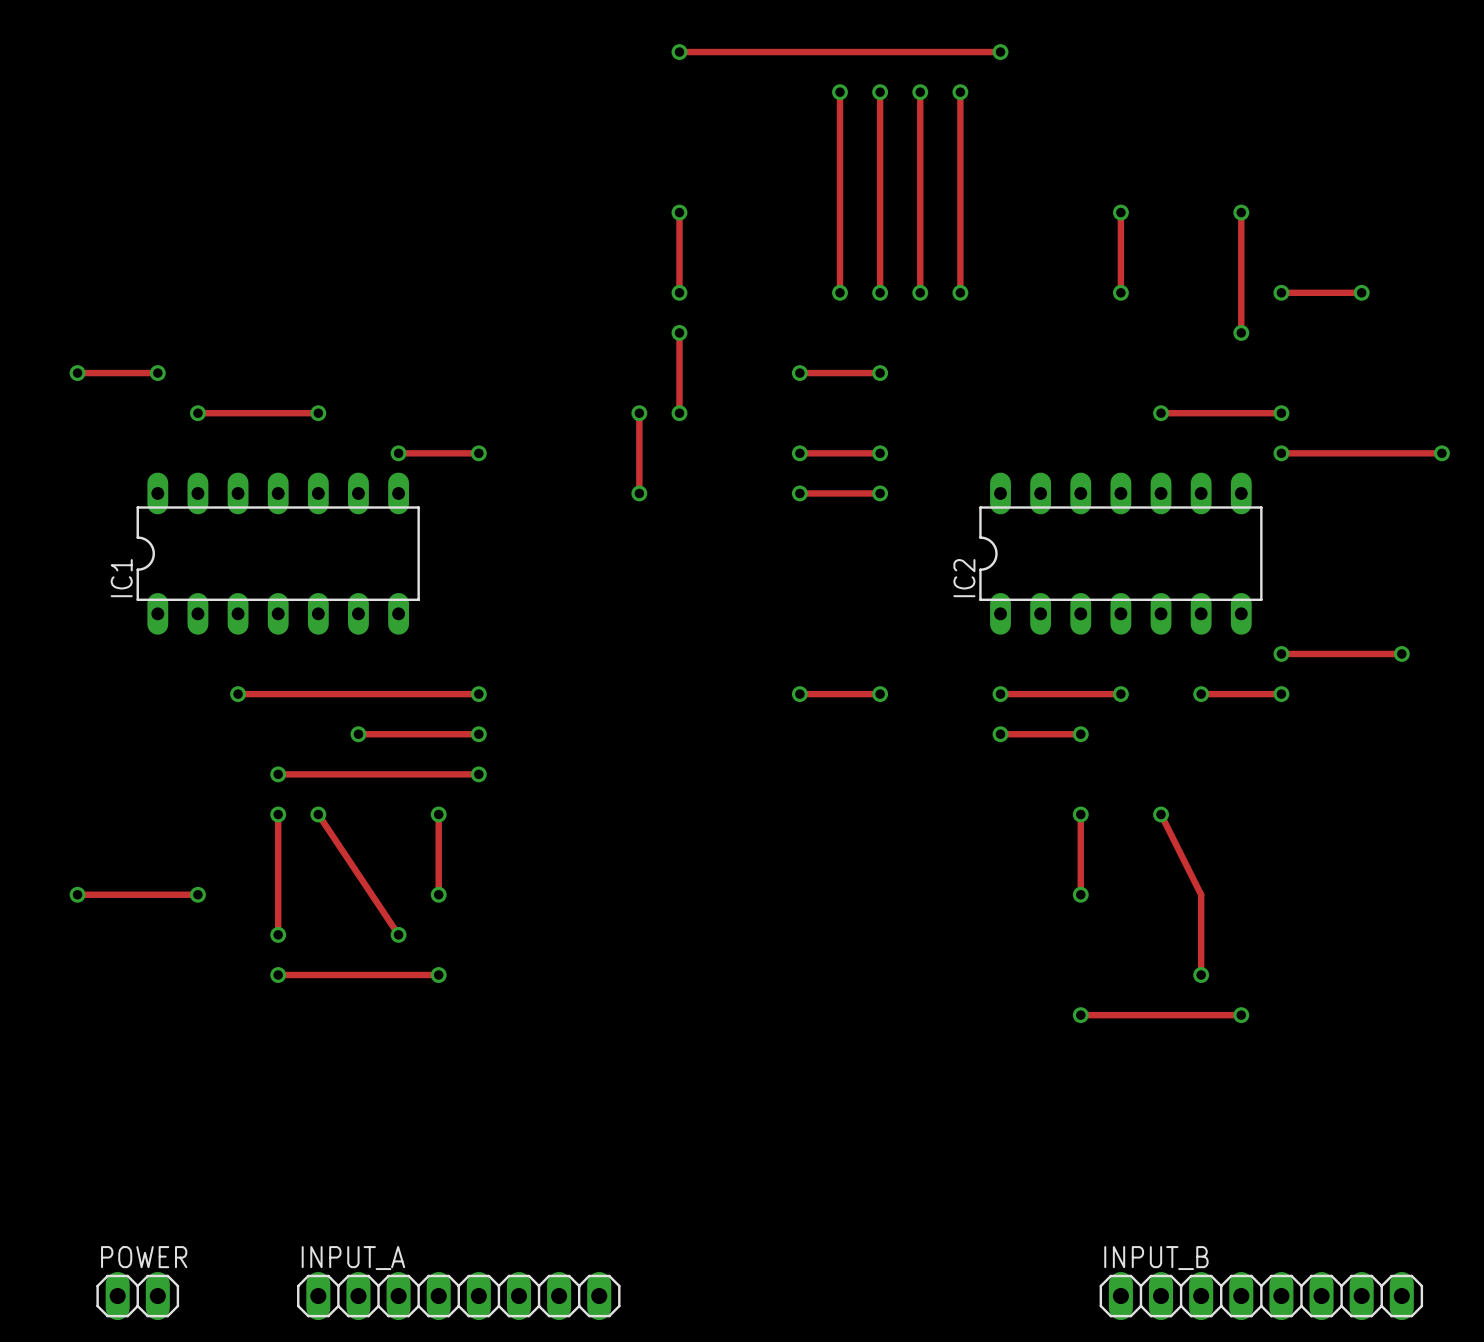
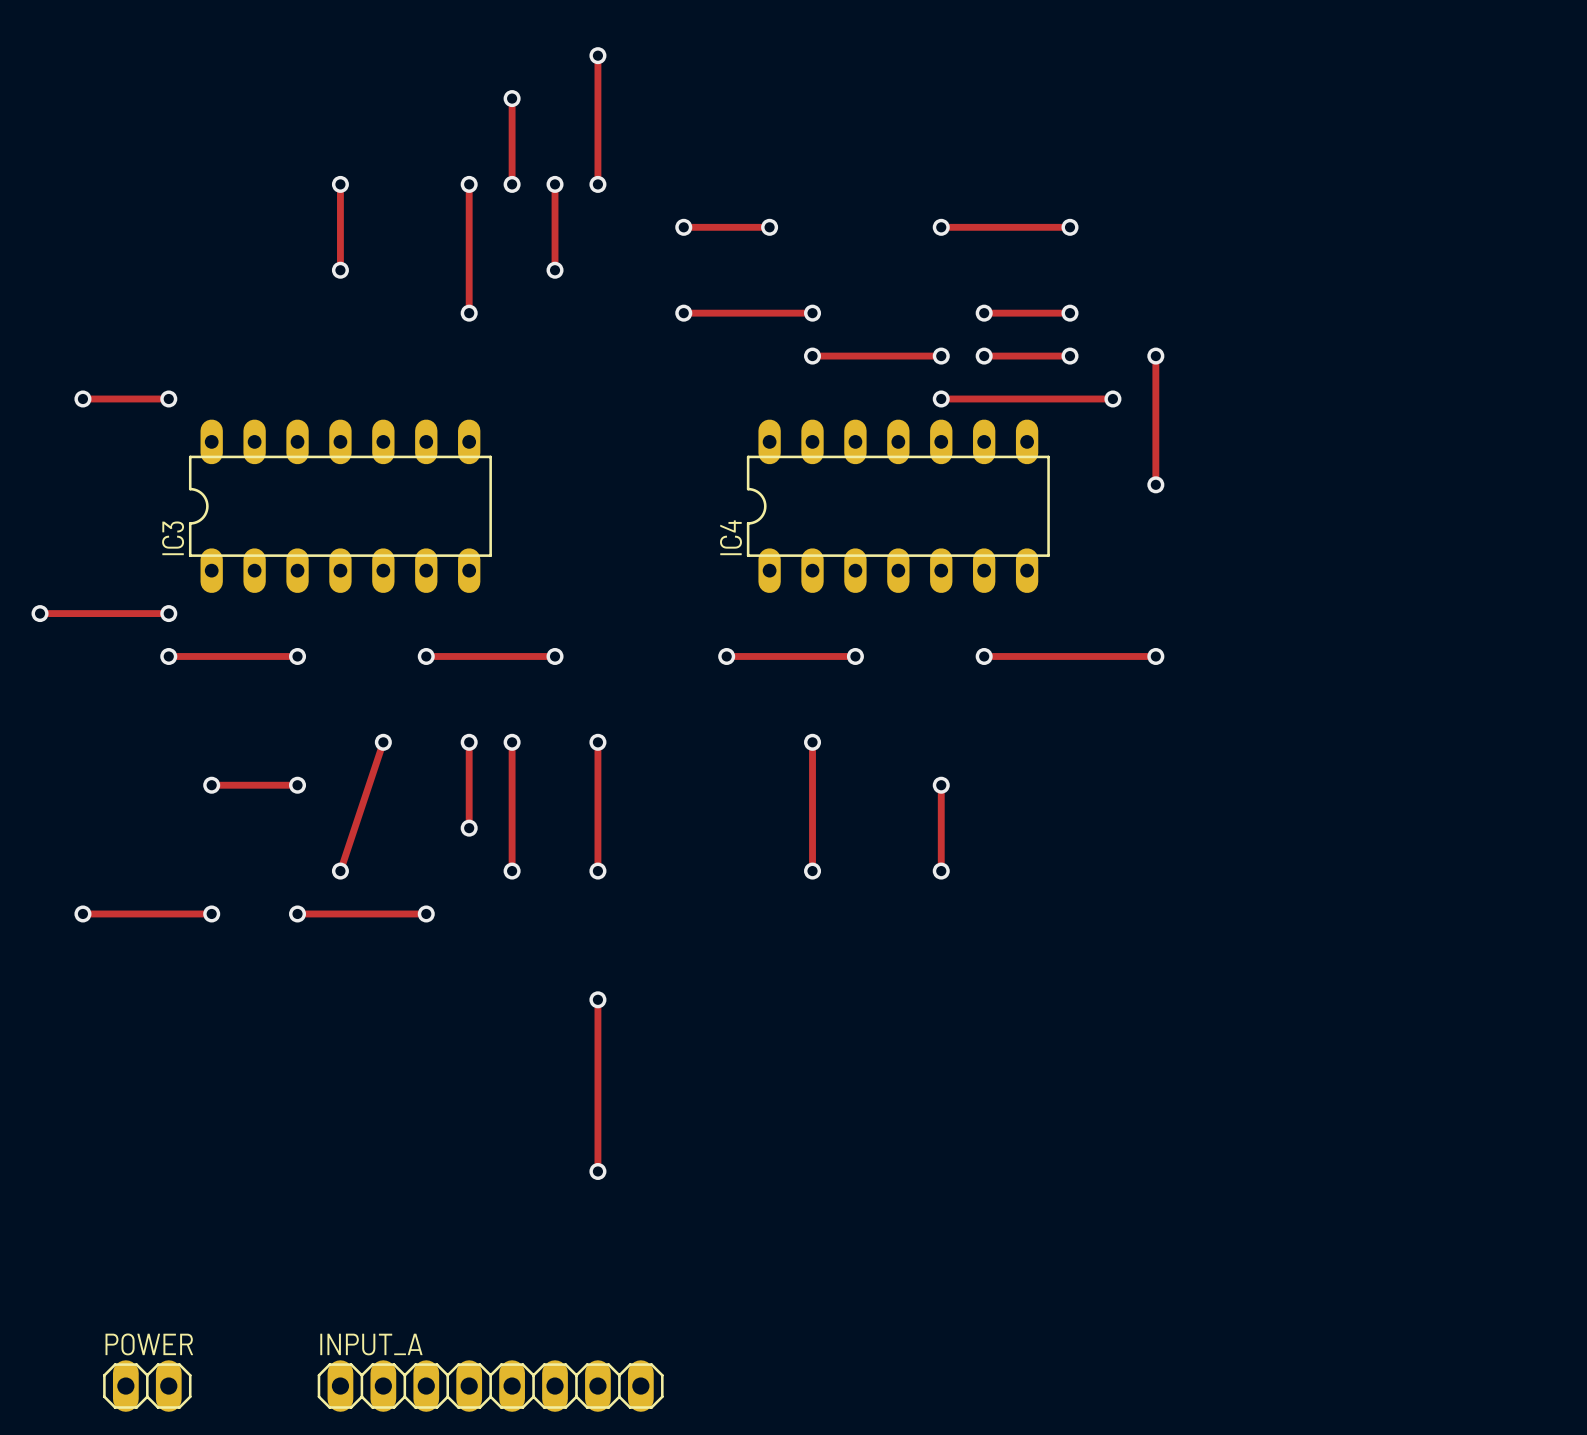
track: none -> (597, 55) (597, 184)
via: none -> (597, 55)
track: (679, 52) (1000, 52) -> none
via: (679, 52) -> none
via: (1000, 52) -> none
via: none -> (512, 98)
track: (840, 92) (840, 292) -> none
via: (840, 92) -> none
track: (880, 92) (880, 292) -> none
via: (880, 92) -> none
track: (920, 92) (920, 292) -> (1070, 313) (984, 313)
via: (920, 92) -> none
track: (960, 92) (960, 292) -> none
via: (960, 92) -> none
track: none -> (340, 184) (340, 270)
via: none -> (340, 184)
track: none -> (469, 184) (469, 313)
via: none -> (469, 184)
via: none -> (512, 184)
via: none -> (555, 184)
via: none -> (597, 184)
via: none -> (683, 227)
track: (679, 212) (679, 292) -> (512, 98) (512, 184)
via: (679, 212) -> none
via: none -> (769, 227)
via: none -> (941, 227)
via: none -> (1070, 227)
track: (1120, 212) (1120, 292) -> none
via: (1120, 212) -> none
track: (1241, 212) (1241, 332) -> (1155, 356) (1155, 484)
via: (1241, 212) -> none
via: none -> (340, 270)
via: none -> (555, 270)
via: none -> (469, 313)
track: none -> (683, 313) (812, 313)
via: none -> (683, 313)
via: (679, 292) -> none
via: none -> (812, 313)
via: (840, 292) -> none
via: (880, 292) -> none
via: (960, 292) -> none
via: none -> (1070, 313)
via: (1120, 292) -> none
track: (1281, 292) (1361, 292) -> none
via: (1281, 292) -> none
via: (1361, 292) -> none
track: (679, 332) (679, 413) -> (555, 184) (555, 270)
via: (679, 332) -> none
track: none -> (812, 356) (941, 356)
via: none -> (812, 356)
via: none -> (941, 356)
via: none -> (984, 356)
via: none -> (1070, 356)
via: none -> (1155, 356)
via: (1241, 332) -> none
track: (799, 373) (880, 373) -> (1112, 398) (941, 398)
via: (799, 373) -> none
via: none -> (1112, 398)
track: (197, 413) (318, 413) -> (40, 613) (168, 613)
via: (197, 413) -> none
via: (318, 413) -> none
track: (639, 413) (639, 493) -> (469, 742) (469, 828)
via: (639, 413) -> none
via: (679, 413) -> none
track: (1161, 413) (1281, 413) -> (941, 227) (1070, 227)
via: (1161, 413) -> none
via: (1281, 413) -> none
track: (398, 453) (478, 453) -> (211, 785) (297, 785)
via: (398, 453) -> none
via: (478, 453) -> none
track: (799, 453) (880, 453) -> (683, 227) (769, 227)
via: (799, 453) -> none
via: (880, 453) -> none
via: none -> (1155, 484)
track: (1281, 453) (1441, 453) -> none
via: (1281, 453) -> none
via: (1441, 453) -> none
IC3: none -> (340, 506)
IC4: none -> (898, 506)
via: (639, 493) -> none
track: (799, 493) (880, 493) -> (984, 356) (1070, 356)
via: (799, 493) -> none
via: (880, 493) -> none
IC1: (278, 553) -> none
IC2: (1120, 553) -> none
via: none -> (40, 613)
via: none -> (168, 613)
via: none -> (168, 656)
via: none -> (297, 656)
track: none -> (426, 656) (555, 656)
via: none -> (426, 656)
via: none -> (555, 656)
via: none -> (726, 656)
via: none -> (855, 656)
track: none -> (984, 656) (1155, 656)
via: none -> (984, 656)
via: none -> (1155, 656)
track: (1281, 653) (1401, 653) -> none
via: (1281, 653) -> none
via: (1401, 653) -> none
track: (238, 694) (478, 694) -> (512, 871) (512, 742)
via: (238, 694) -> none
via: none -> (383, 742)
via: none -> (469, 742)
via: none -> (597, 742)
track: none -> (812, 742) (812, 871)
via: none -> (812, 742)
track: (799, 694) (880, 694) -> none
via: (799, 694) -> none
via position: (880, 694) -> (941, 785)
track: (1000, 694) (1120, 694) -> (726, 656) (855, 656)
via: (1000, 694) -> none
via: (1120, 694) -> none
track: (1201, 694) (1281, 694) -> none
via: (1201, 694) -> none
via: (1281, 694) -> none
via: none -> (211, 785)
via: none -> (297, 785)
track: (358, 734) (478, 734) -> (168, 656) (297, 656)
via: (358, 734) -> none
via: (478, 734) -> none
track: (1000, 734) (1080, 734) -> none
via: (1000, 734) -> none
via: (1080, 734) -> none
track: (278, 774) (478, 774) -> none
via: (278, 774) -> none
via: none -> (469, 828)
via: (478, 774) -> none
track: (278, 814) (278, 934) -> (597, 742) (597, 871)
via: (278, 814) -> none
track: (318, 814) (398, 934) -> (340, 871) (383, 742)
track: (438, 814) (438, 894) -> none
via: (438, 814) -> none
via: none -> (512, 871)
via: none -> (597, 871)
via: none -> (812, 871)
via: none -> (941, 871)
track: (1080, 814) (1080, 894) -> (941, 785) (941, 871)
via: (1080, 814) -> none
track: (1161, 814) (1201, 894) (1201, 975) -> none
via: (1161, 814) -> none
track: none -> (297, 913) (426, 913)
via: none -> (297, 913)
via: none -> (426, 913)
track: (77, 894) (197, 894) -> (82, 913) (211, 913)
via position: (77, 894) -> (82, 913)
via position: (197, 894) -> (211, 913)
via: (438, 894) -> none
via: (1080, 894) -> none
via: (278, 934) -> none
via: (398, 934) -> none
track: none -> (597, 999) (597, 1171)
via: none -> (597, 999)
track: (278, 975) (438, 975) -> none
via: (278, 975) -> none
via: (438, 975) -> none
via: (1201, 975) -> none
track: (1080, 1015) (1241, 1015) -> none
via: (1080, 1015) -> none
via: (1241, 1015) -> none
via: none -> (597, 1171)
INPUT_B: (1261, 1296) -> none

